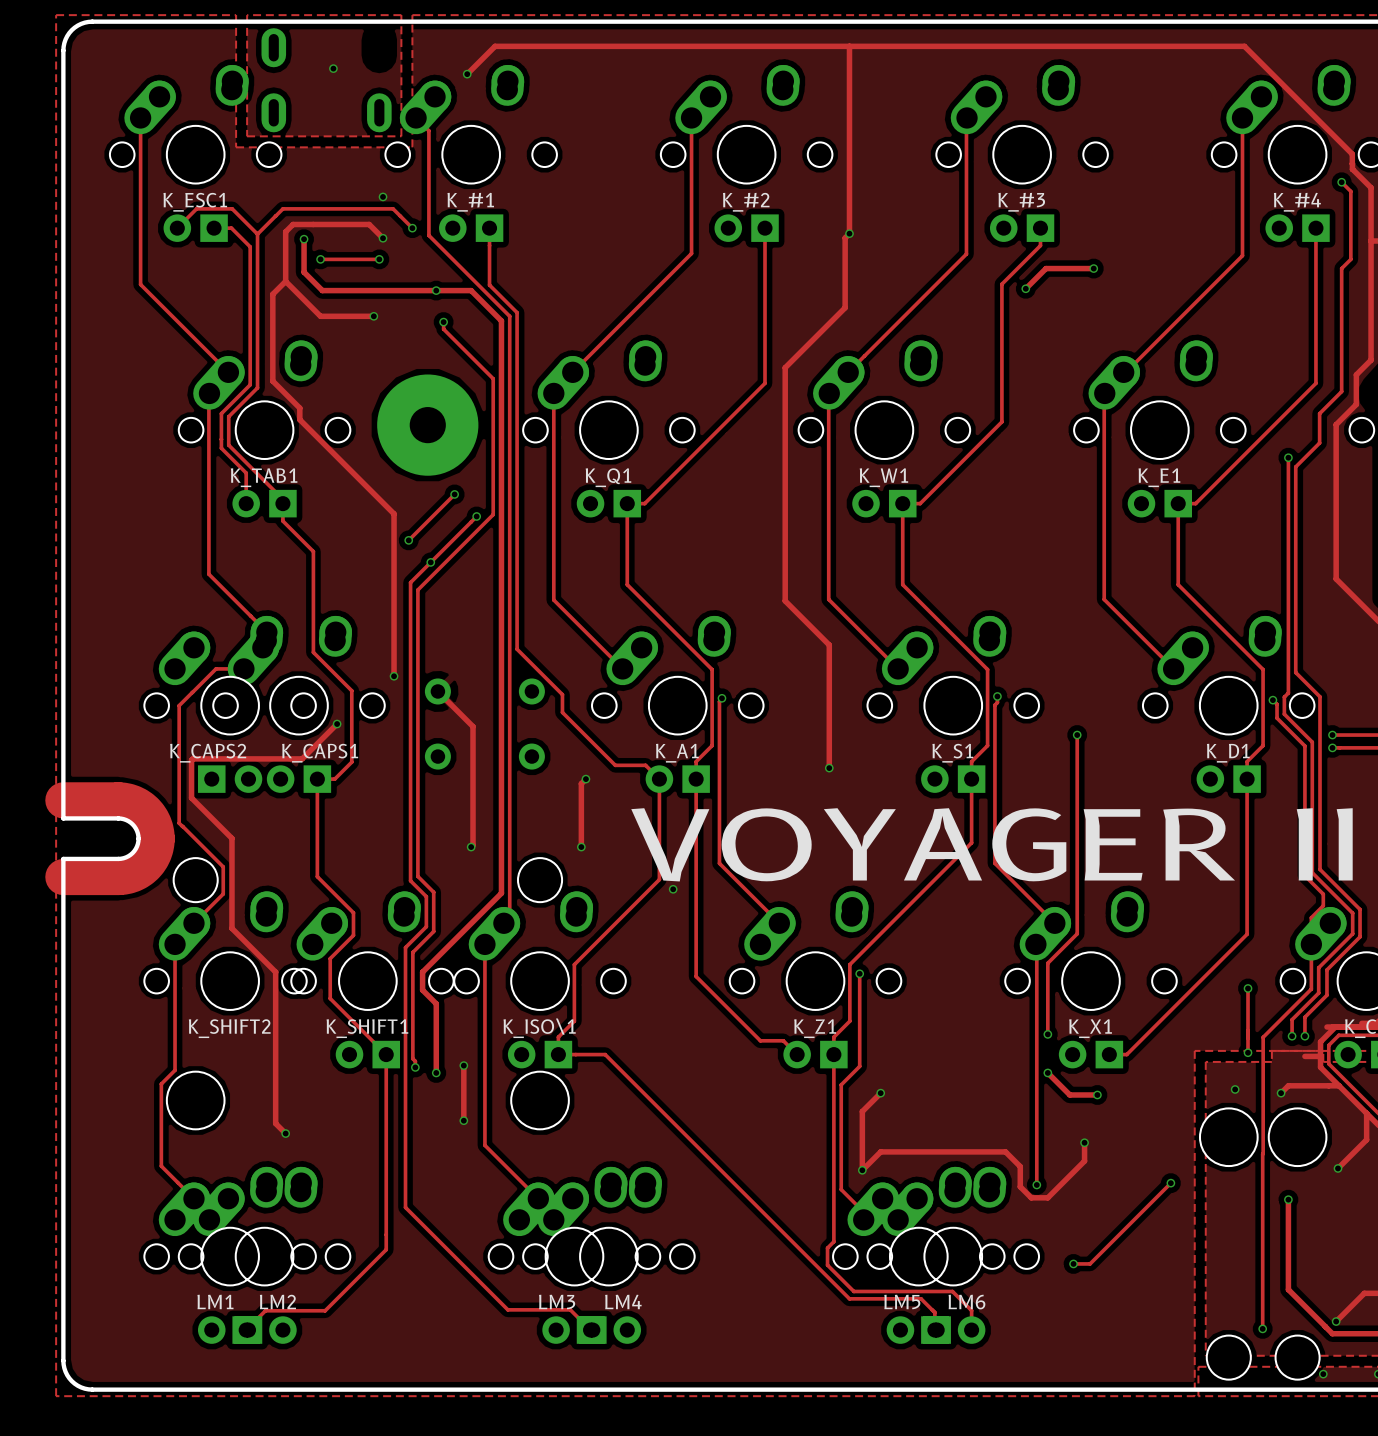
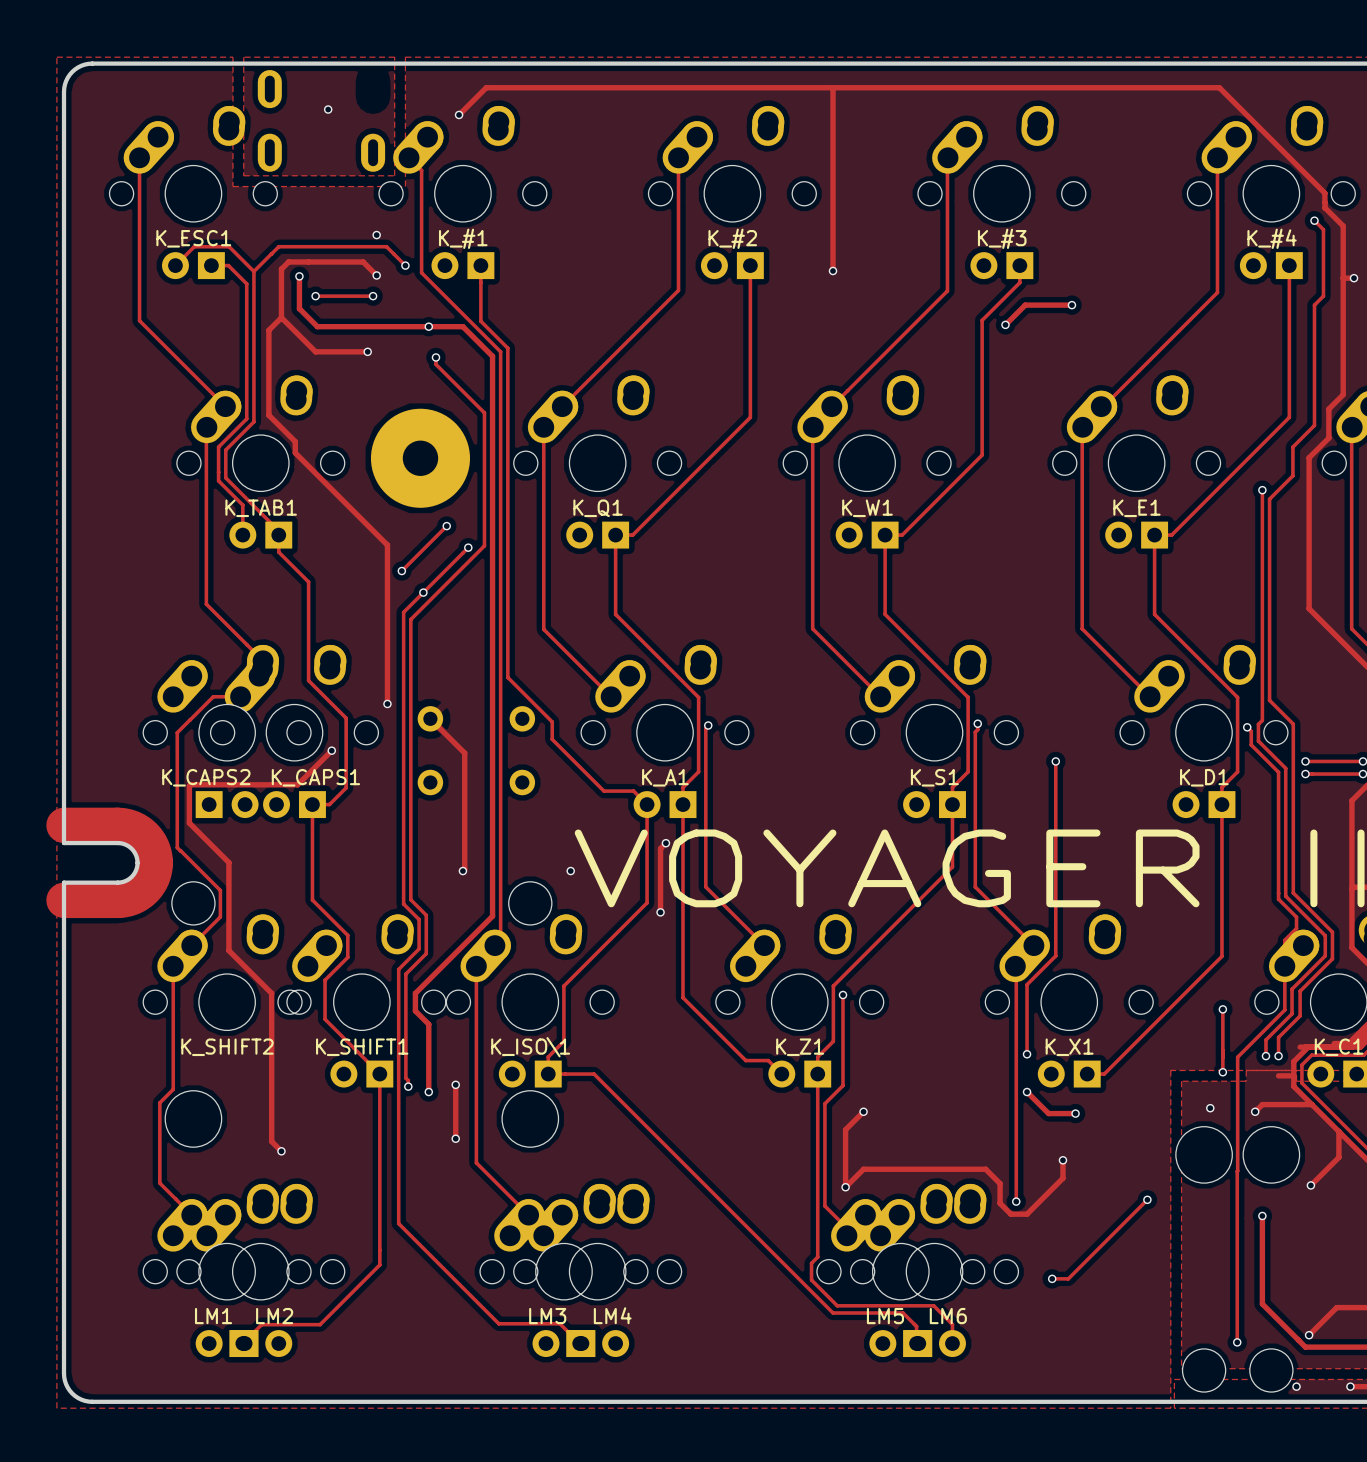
track: (849, 233) (845, 238) (845, 307) (785, 367) (785, 600) (829, 645) (829, 768) -> none
via: (829, 768) -> none
track: (585, 779) (581, 783) (581, 847) -> none
via: (585, 779) -> none
track: none -> (665, 843) (660, 848) (660, 912)
via: none -> (665, 843)

